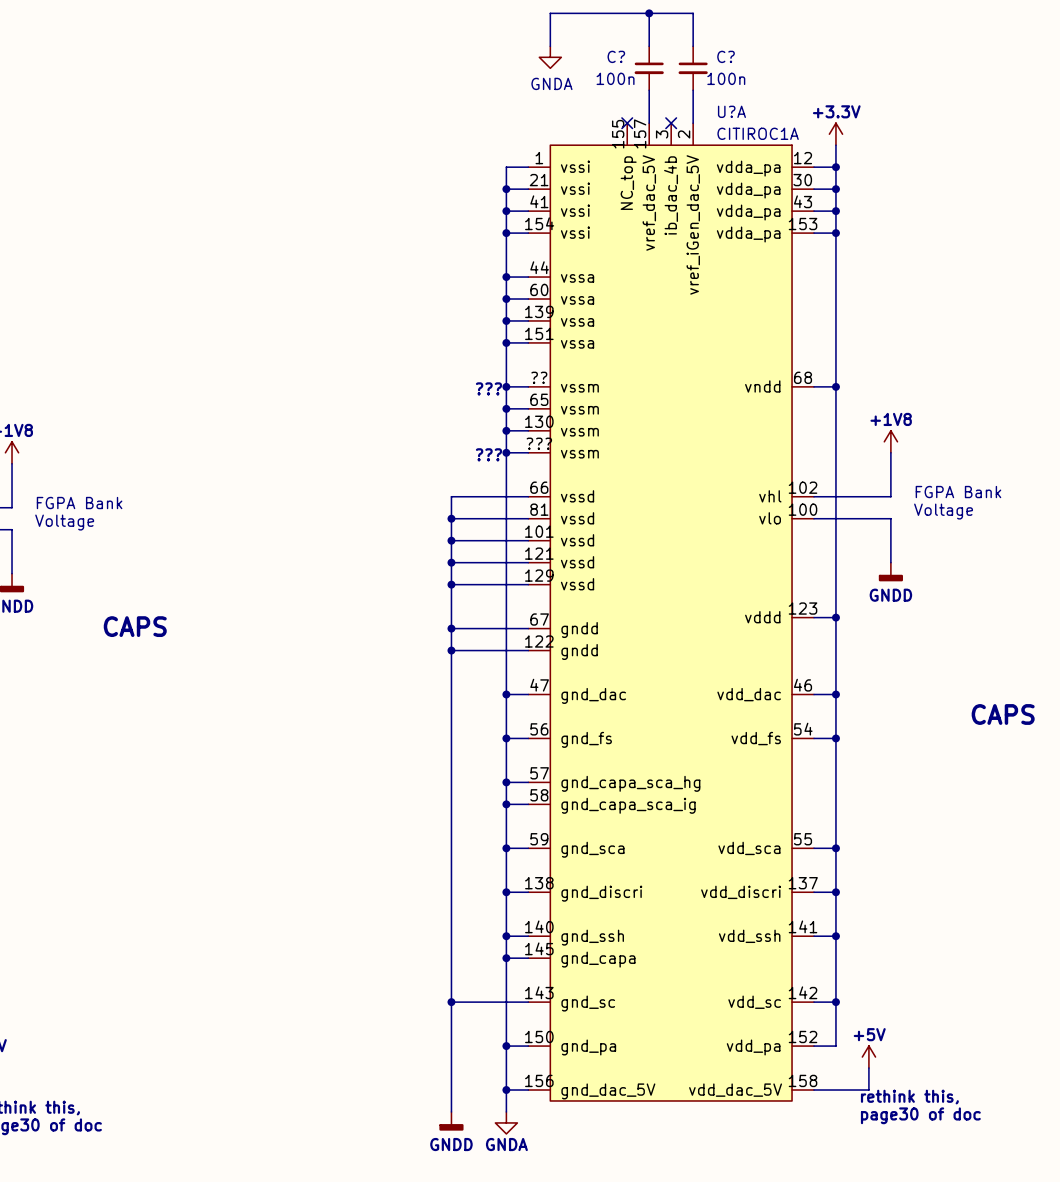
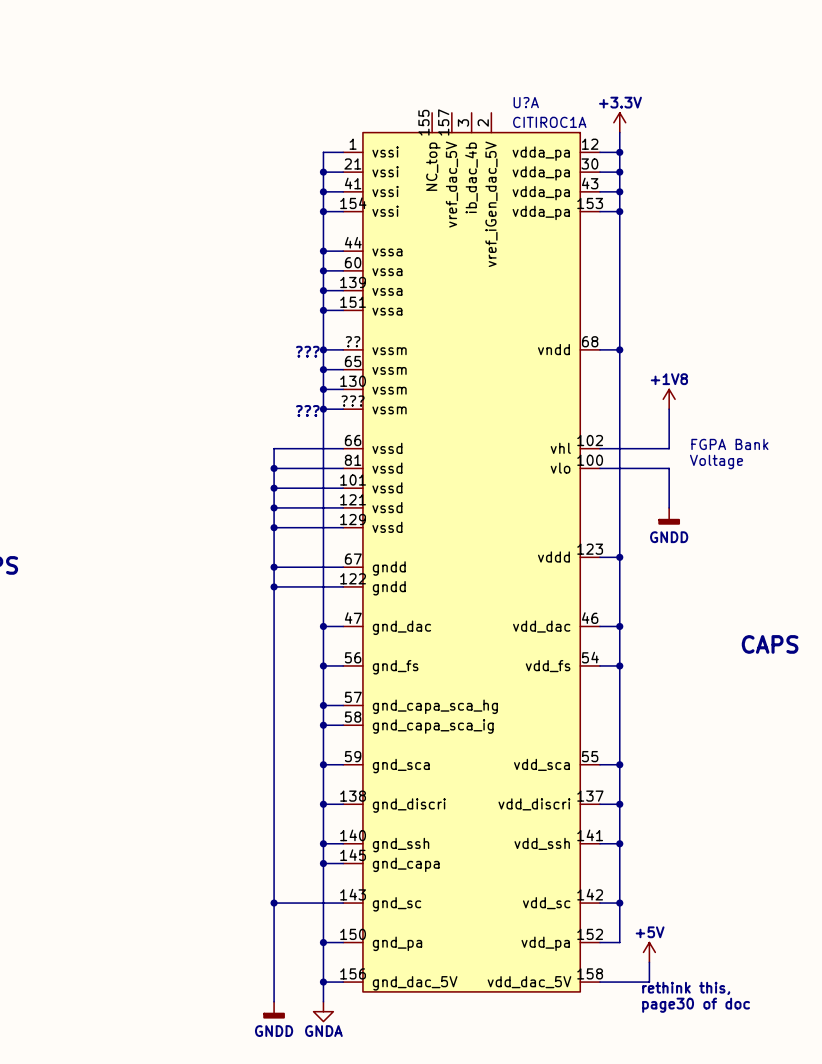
wire: (649, 13) (649, 46) -> none
junction: (649, 13) -> none
wire: (550, 46) (550, 13) (693, 13) (693, 46) -> none
power symbol: GNDA (550, 57) -> none
C?: 100n (649, 68) -> none
C?: 100n (693, 68) -> none
wire: (649, 90) (649, 123) -> none
wire: (693, 90) (693, 123) -> none
no-connect mark: (627, 123) -> none
no-connect mark: (671, 123) -> none

